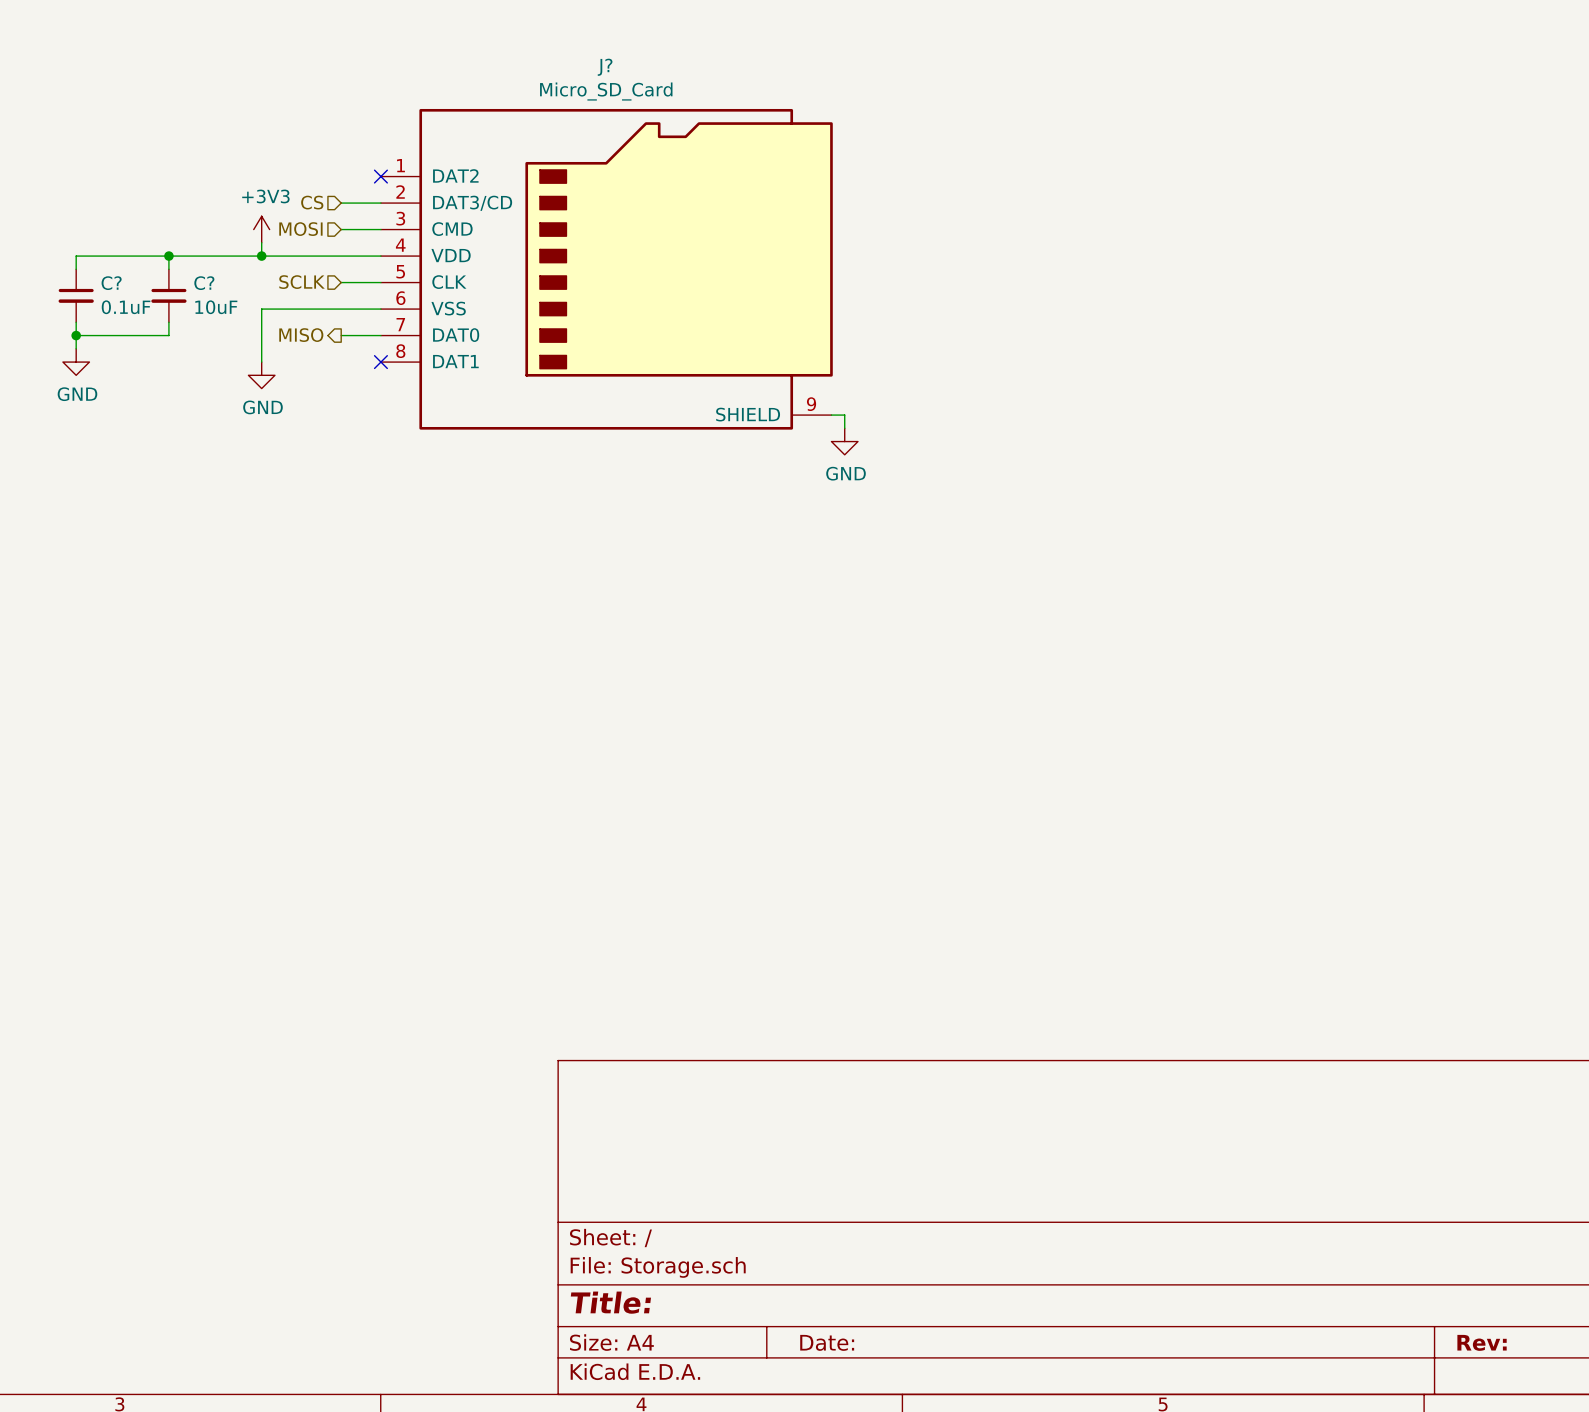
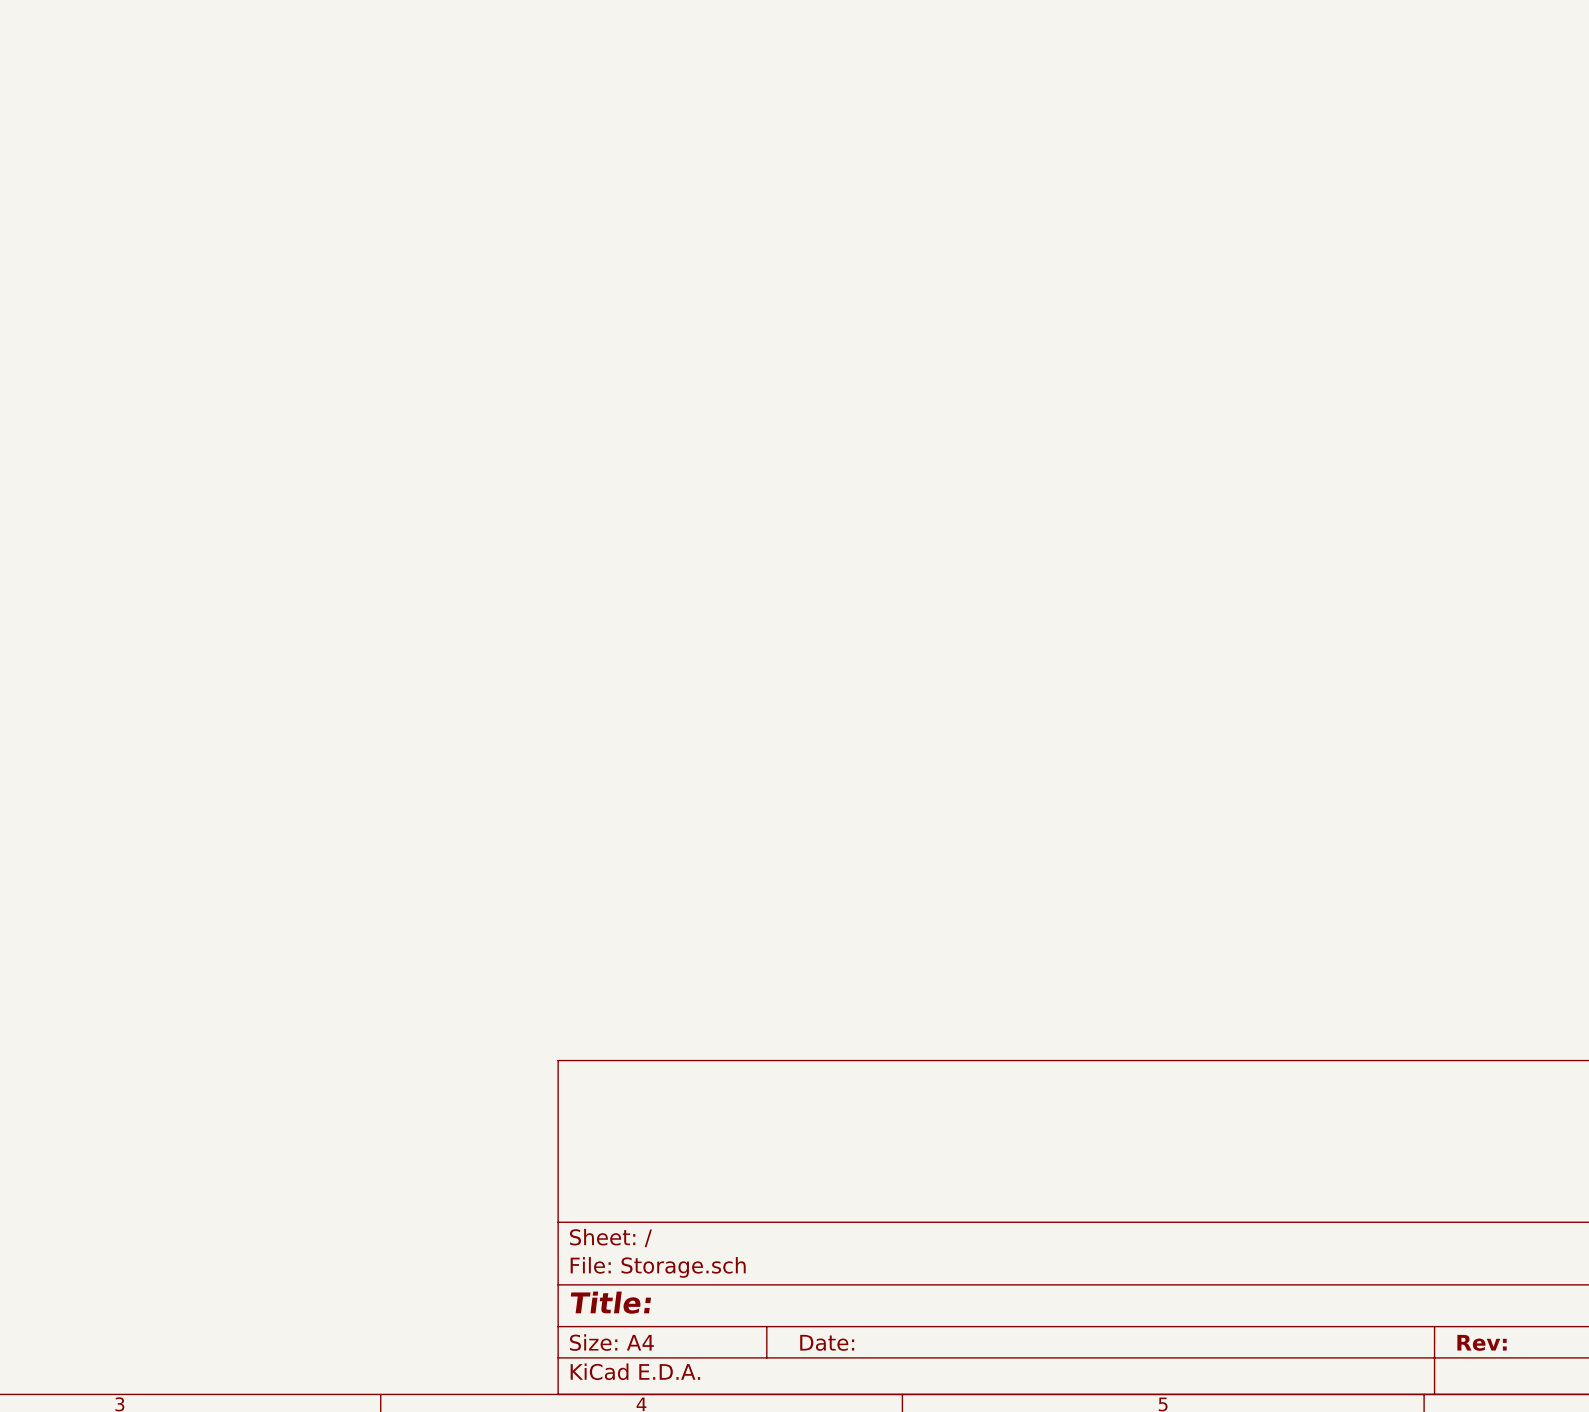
no-connect mark: (380, 176) -> none
hierarchical label: CS (312, 202) -> none
wire: (341, 203) (380, 203) -> none
power symbol: +3V3 (261, 229) -> none
hierarchical label: MOSI (300, 229) -> none
wire: (341, 229) (380, 229) -> none
wire: (261, 242) (261, 256) -> none
wire: (168, 256) (168, 269) -> none
junction: (168, 256) -> none
junction: (261, 256) -> none
wire: (380, 256) (76, 256) (76, 269) -> none
J?: Micro_SD_Card (606, 269) -> none
hierarchical label: SCLK (302, 282) -> none
wire: (341, 282) (380, 282) -> none
C?: 0.1uF (76, 295) -> none
C?: 10uF (168, 295) -> none
wire: (380, 309) (261, 309) (261, 362) -> none
wire: (76, 322) (76, 348) -> none
wire: (168, 322) (168, 335) (76, 335) -> none
junction: (76, 335) -> none
hierarchical label: MISO (301, 335) -> none
wire: (341, 335) (380, 335) -> none
power symbol: GND (76, 362) -> none
no-connect mark: (380, 362) -> none
power symbol: GND (261, 375) -> none
wire: (831, 415) (844, 415) (844, 428) -> none
power symbol: GND (844, 441) -> none

